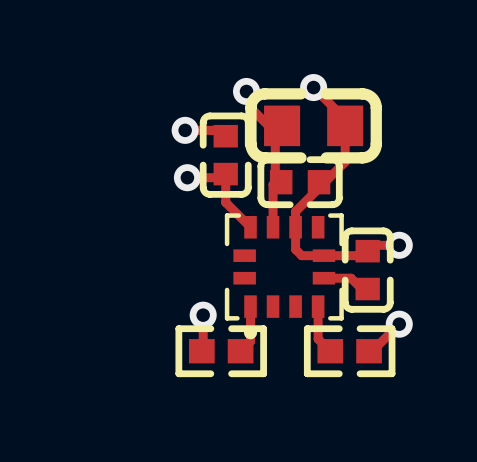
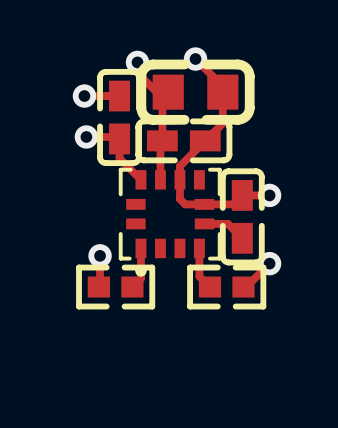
part footprint: [199, 112, 252, 198] -> [97, 68, 142, 167]
part footprint: [257, 156, 343, 209] -> [135, 118, 233, 164]
part footprint: [341, 227, 394, 313] -> [219, 168, 265, 266]

